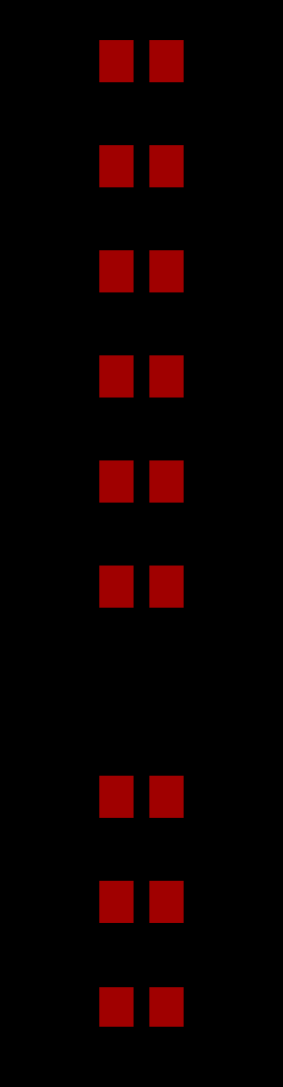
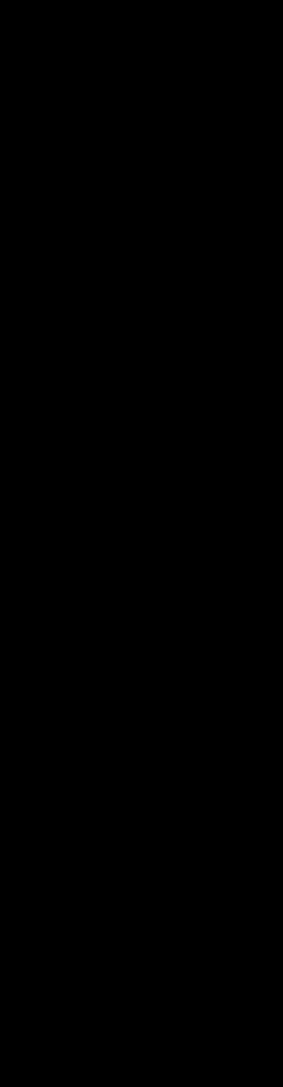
part: (141, 61) -> none
part: (141, 166) -> none
part: (141, 271) -> none
part: (141, 376) -> none
part: (141, 481) -> none
part: (141, 586) -> none
part: (141, 796) -> none
part: (141, 901) -> none
part: (141, 1006) -> none

